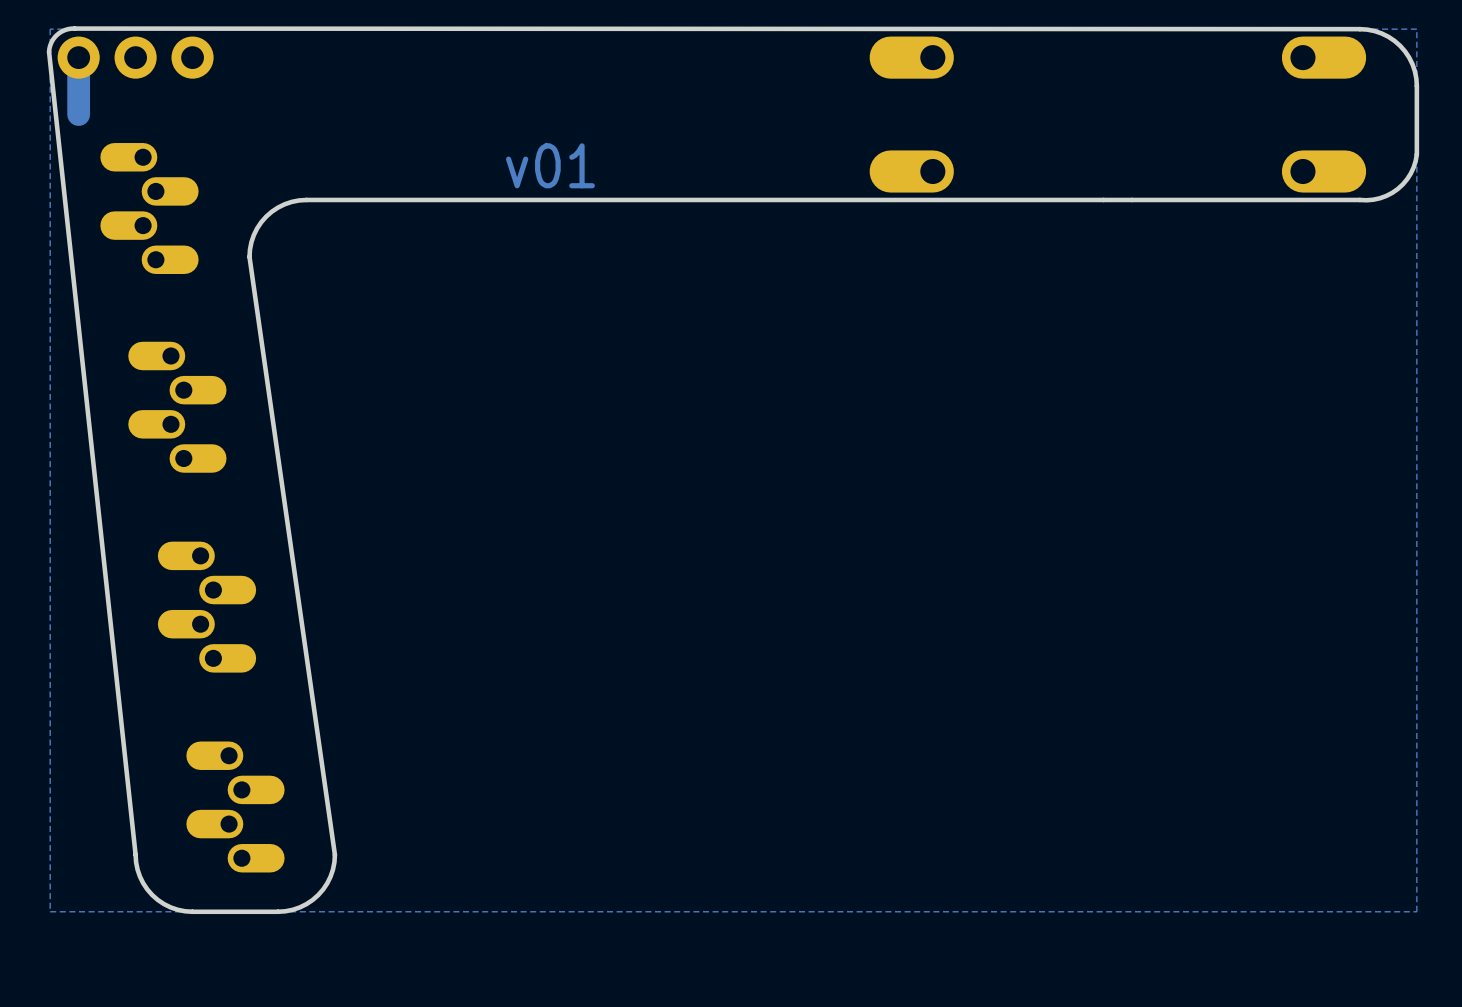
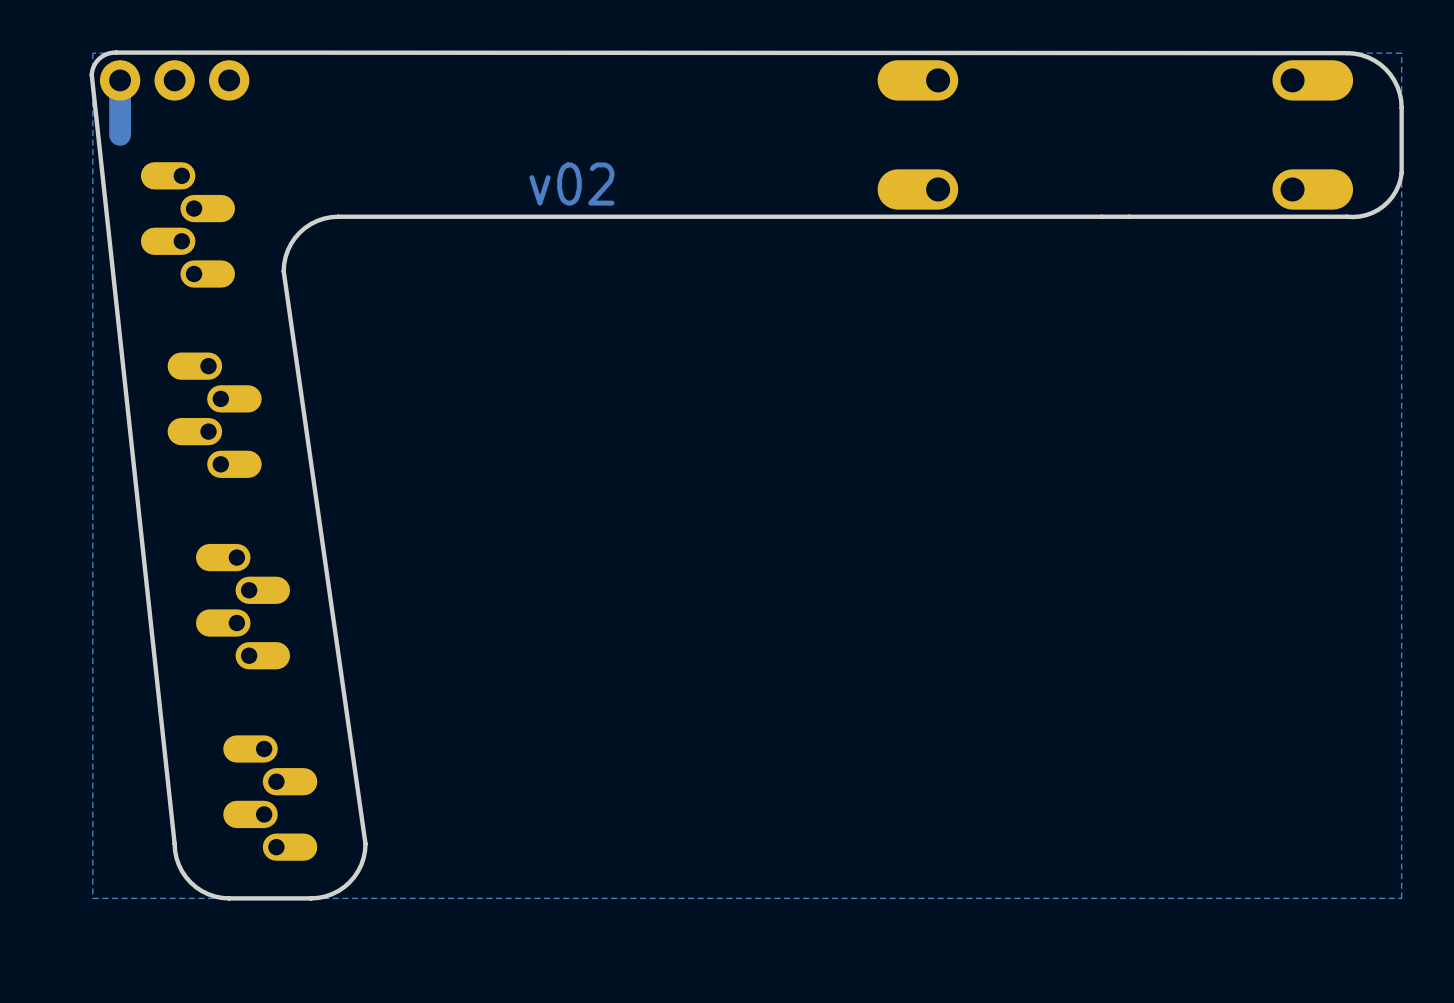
text: v01 (550, 165) -> v02 (571, 184)

